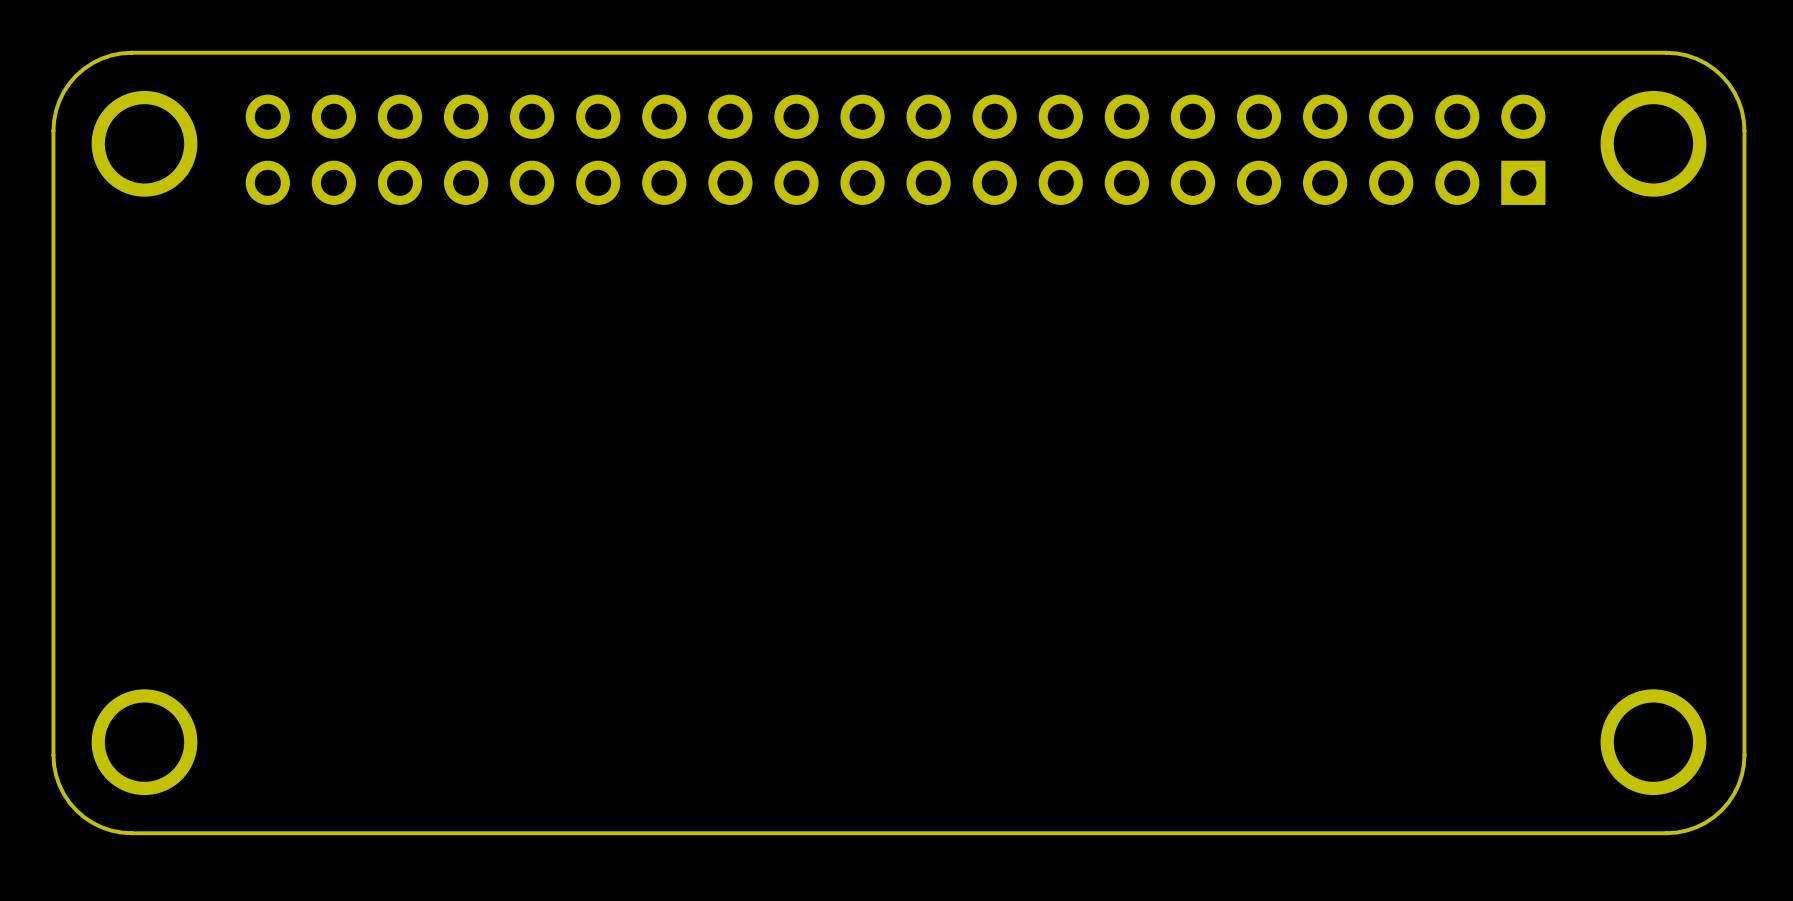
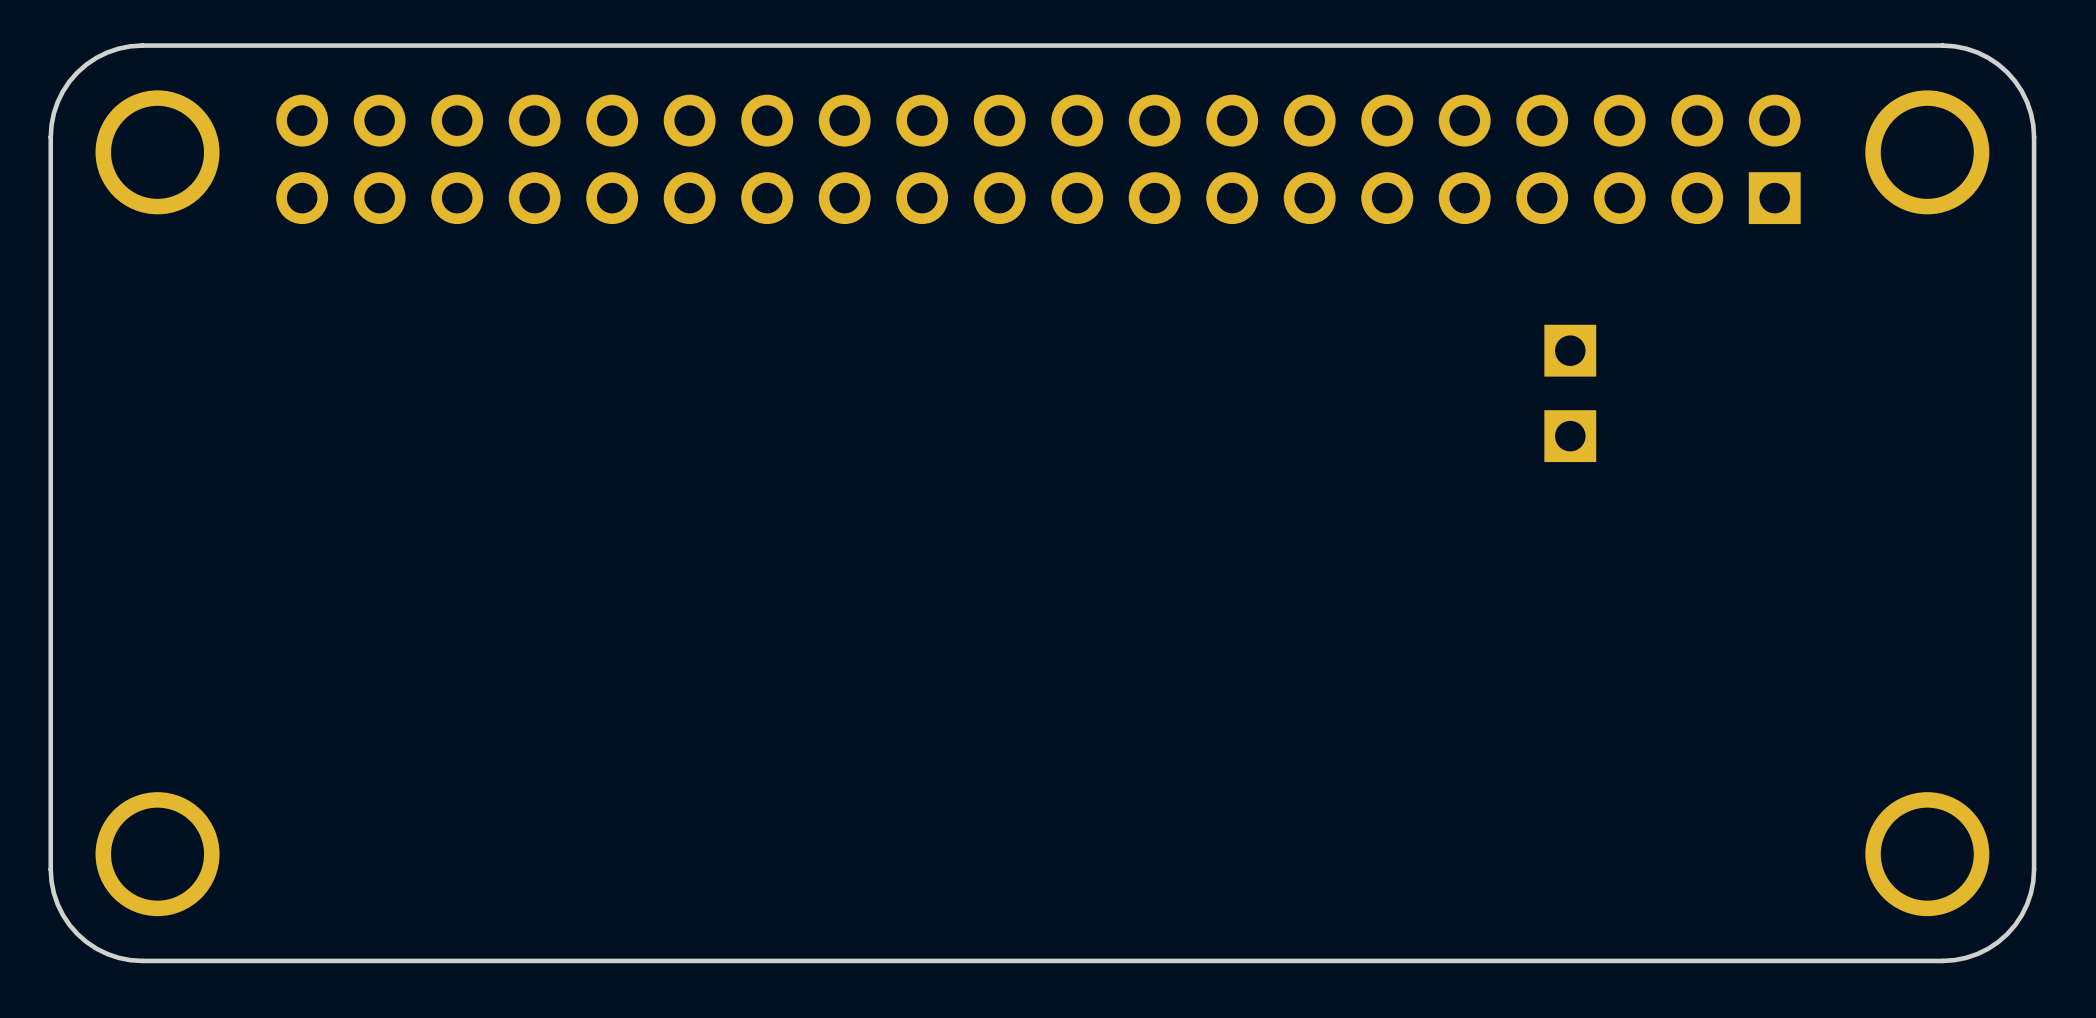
part: none -> (1570, 350)
part: none -> (1570, 436)

